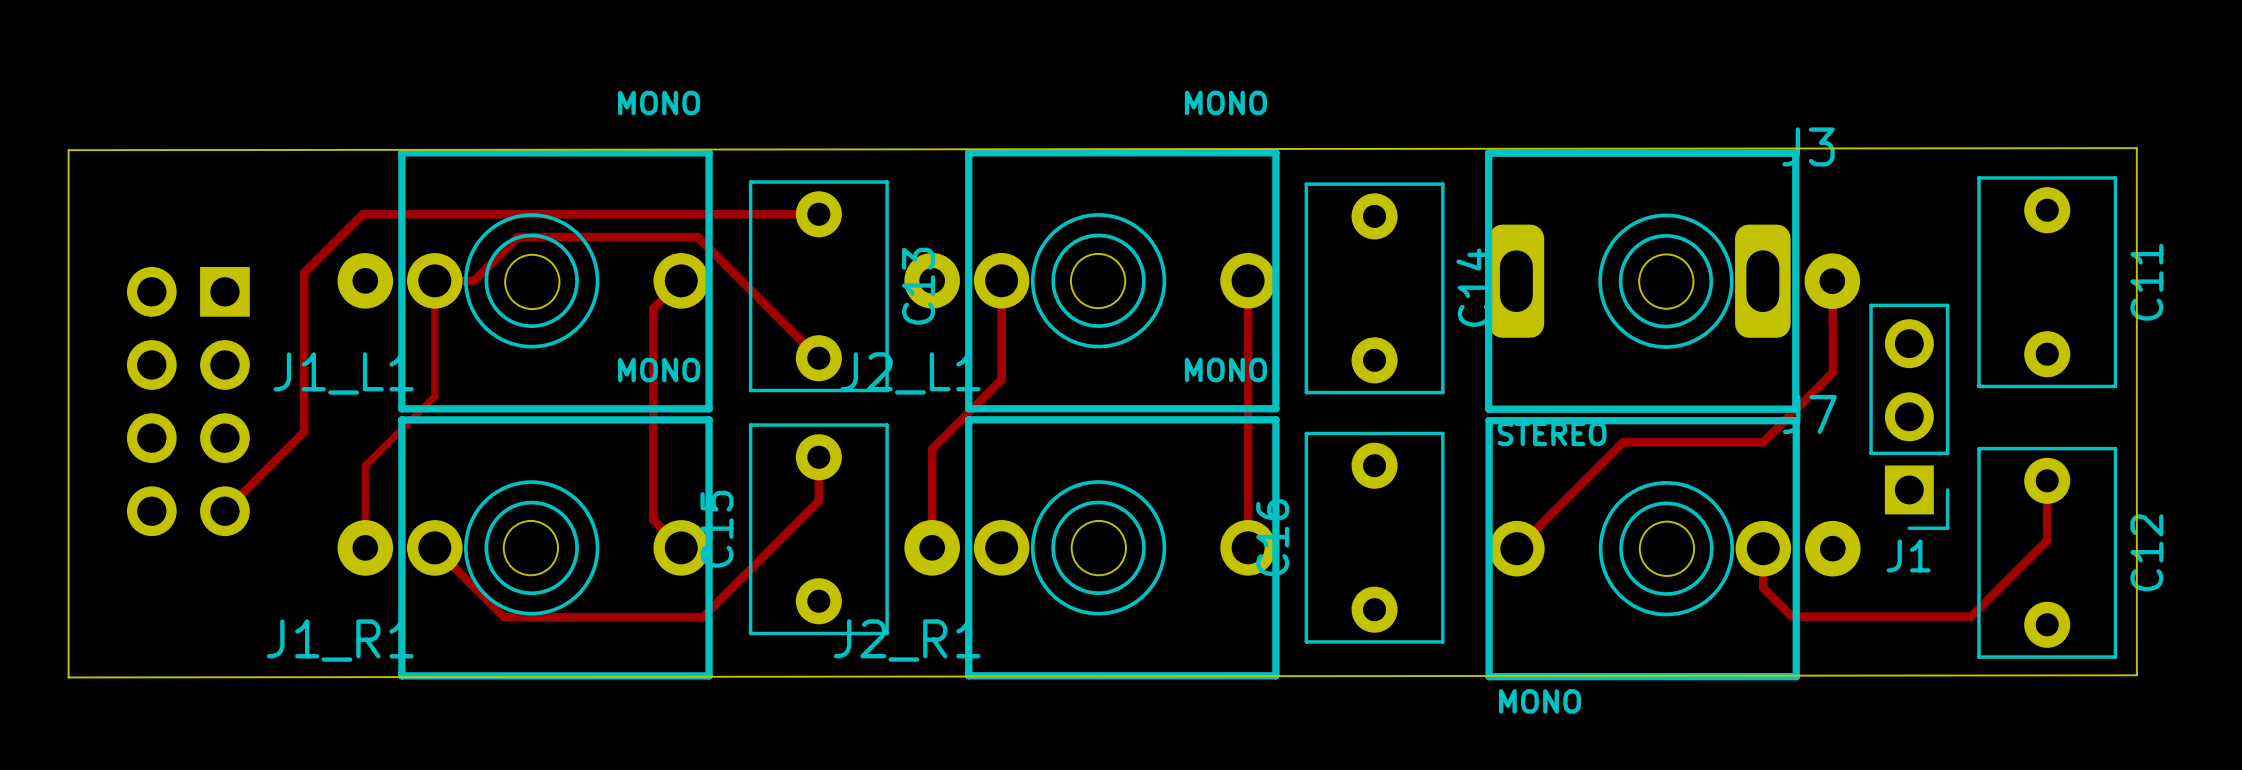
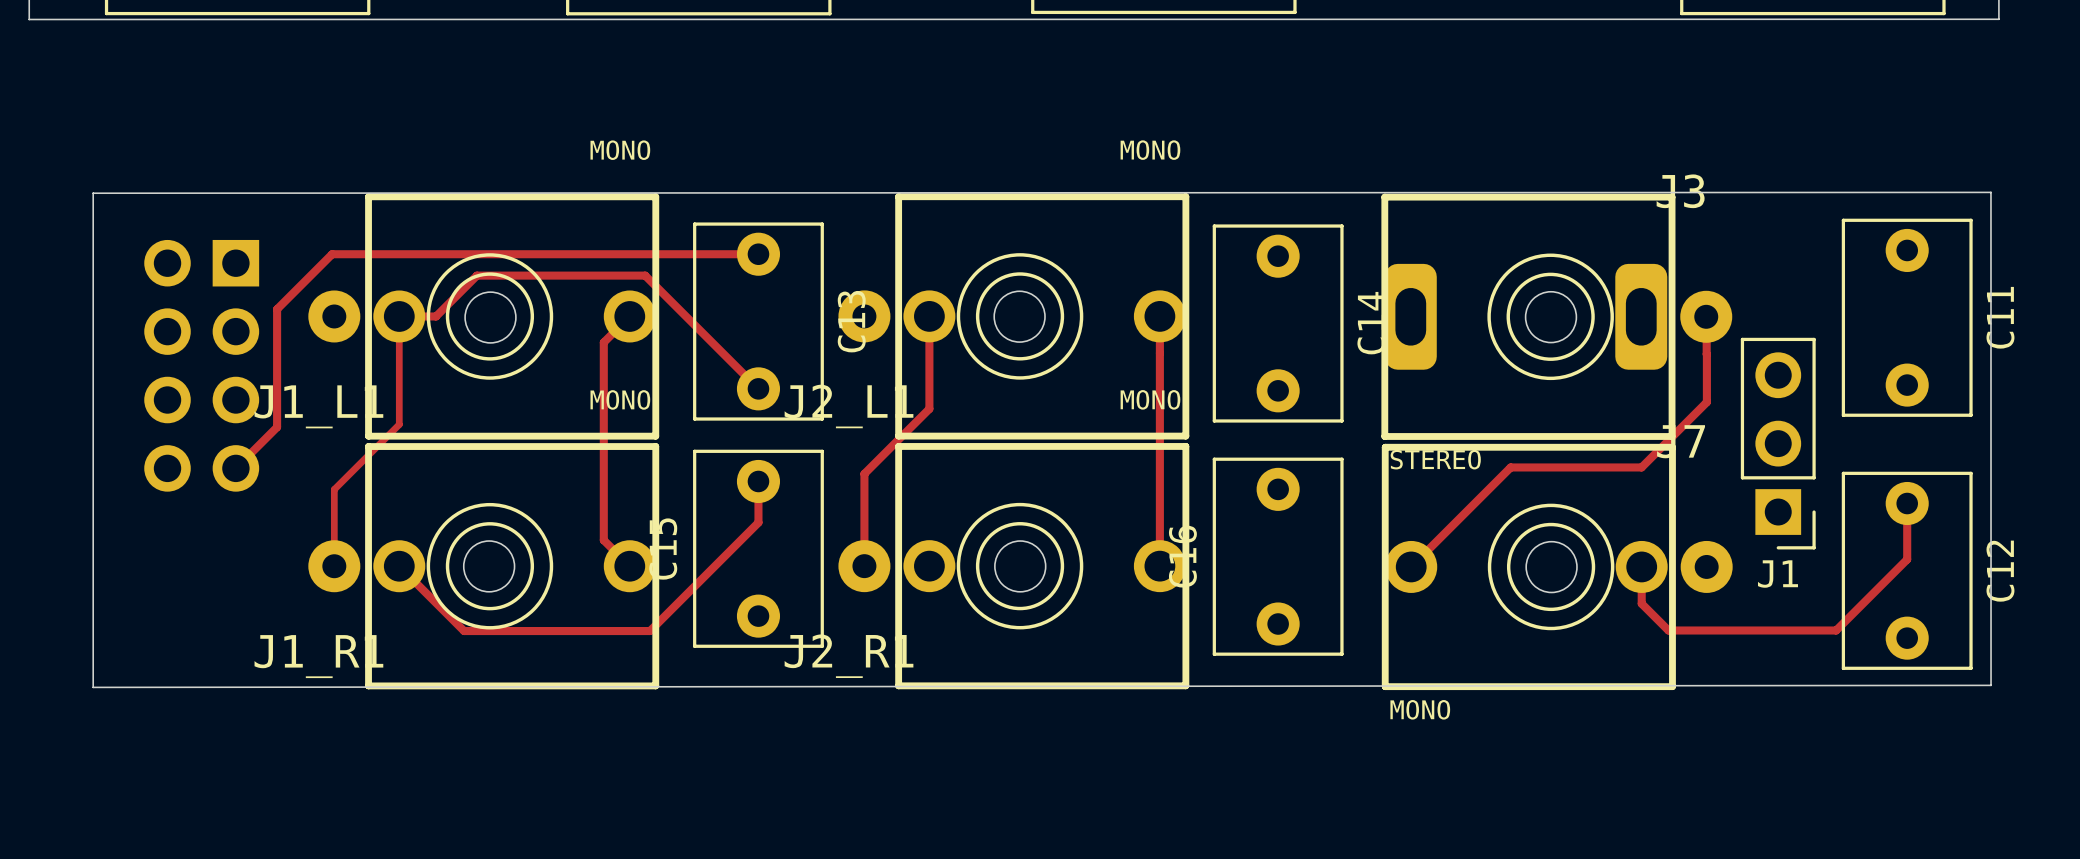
board edge: (2136, 148) (68, 150) (68, 677) (2136, 675) -> (1990, 192) (93, 193) (93, 687) (1991, 685)
track: (304, 399) (304, 432) (224, 511) -> (277, 427) (235, 468)
part position: (188, 401) -> (201, 365)

